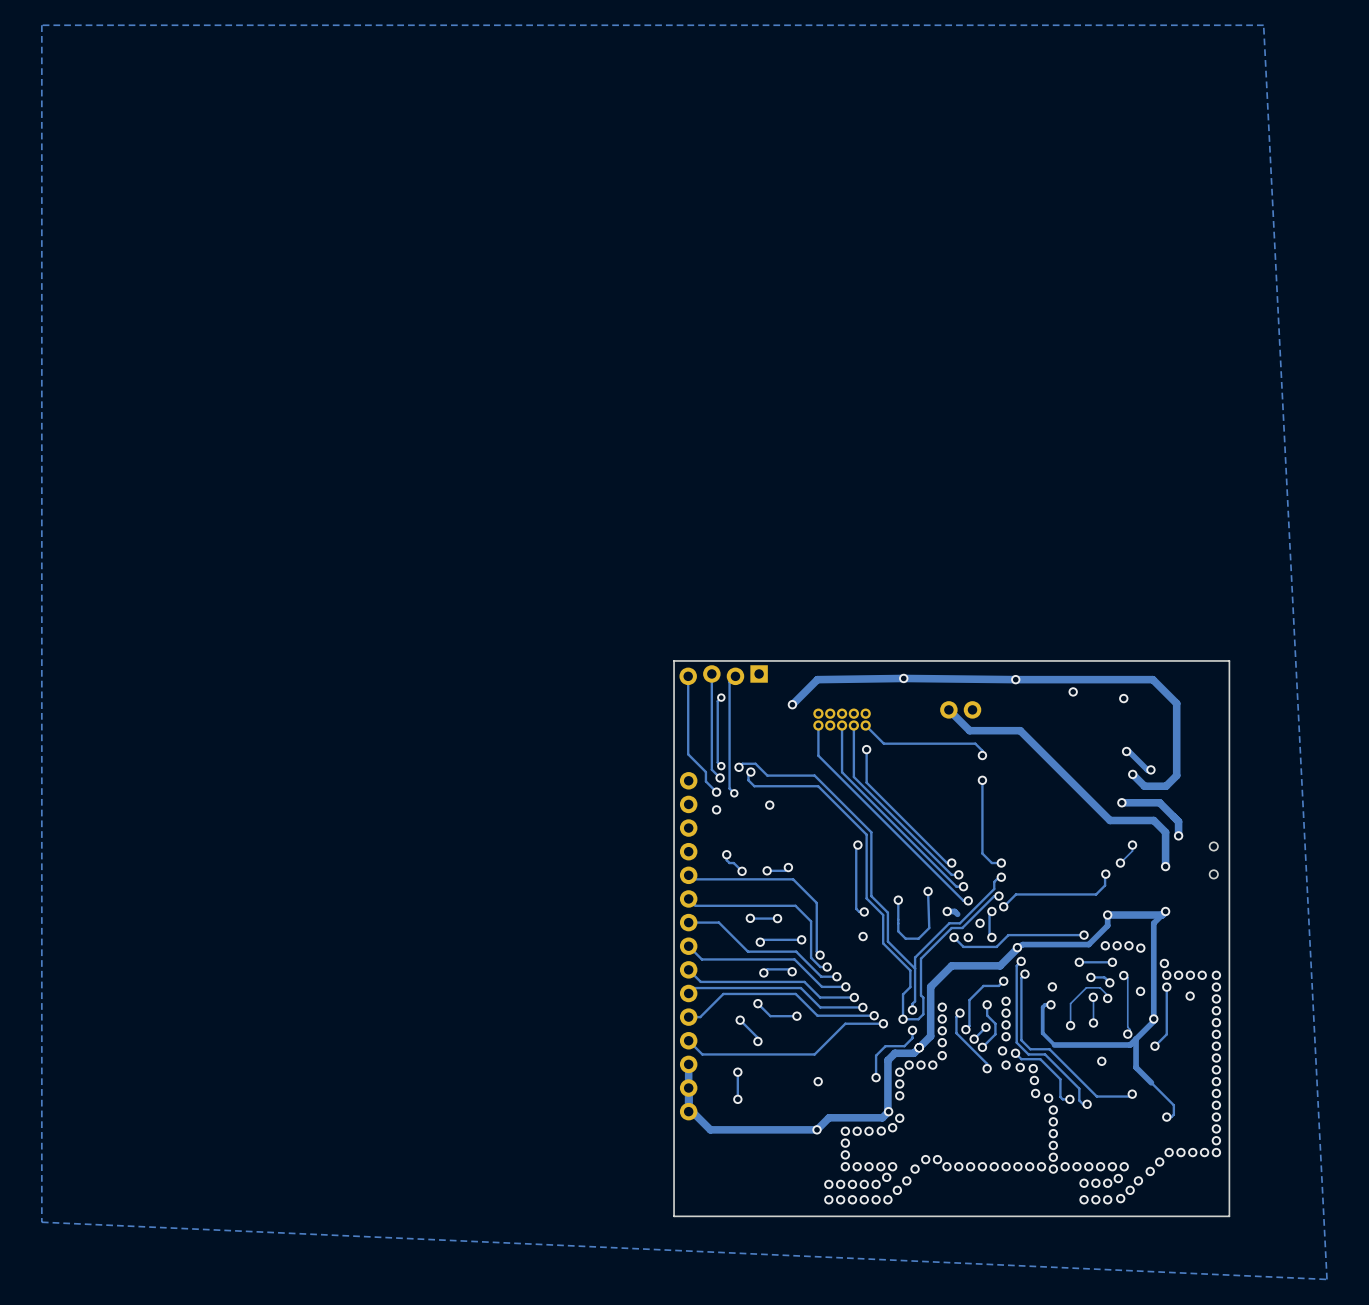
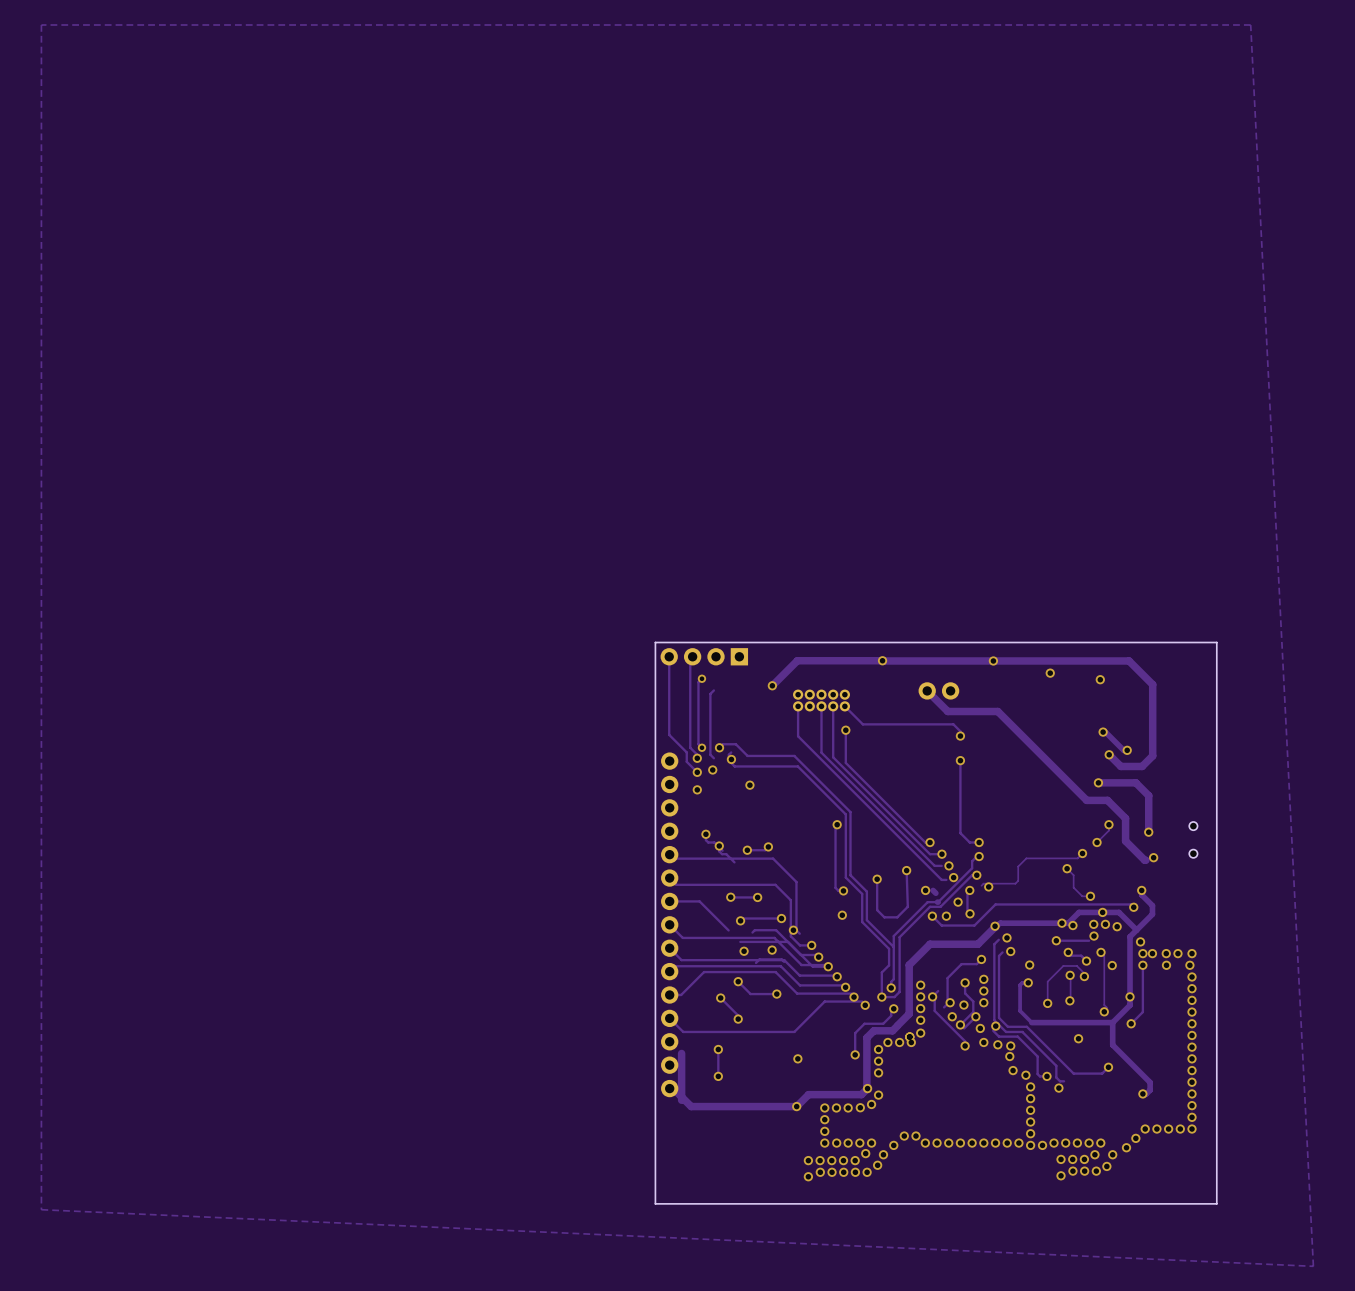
board edge: (1229, 660) (674, 660) (674, 1216) -> (1216, 654) (1216, 642) (655, 642) (655, 1203) (667, 1203)
track: none -> (669, 656) (669, 734) (686, 752) (686, 761) (697, 772)
track: none -> (692, 656) (690, 659) (690, 747) (697, 754) (697, 758)
part: none -> (704, 656)
track: (711, 673) (711, 769) (720, 777) -> none
part: (723, 675) -> none
track: (688, 676) (688, 754) (705, 772) (705, 781) (716, 792) -> none
track: (735, 676) (729, 682) (729, 788) (734, 793) -> none
via position: (903, 678) -> (882, 660)
via position: (1015, 679) -> (993, 660)
track: none -> (701, 678) (698, 682) (698, 744) (701, 747)
via position: (1073, 691) -> (1050, 673)
track: none -> (772, 685) (797, 660) (1129, 660) (1152, 684) (1152, 755) (1142, 766) (1120, 766) (1109, 754)
via position: (721, 697) -> (701, 678)
track: none -> (927, 690) (947, 711) (997, 711) (1086, 800) (1107, 800) (1125, 818) (1125, 841) (1145, 860)
via position: (1123, 698) -> (1100, 679)
track: (792, 704) (817, 679) (1152, 679) (1176, 703) (1176, 775) (1166, 786) (1144, 786) (1132, 774) -> none
via position: (792, 704) -> (772, 685)
track: (948, 709) (969, 730) (1020, 730) (1110, 820) (1153, 820) (1165, 832) (1165, 866) -> none
part position: (960, 709) -> (938, 690)
part position: (842, 719) -> (821, 700)
track: (818, 725) (818, 755) (963, 900) (968, 900) -> (798, 706) (798, 736) (941, 879) (946, 879)
track: (842, 725) (842, 772) (956, 886) (963, 886) -> (821, 706) (821, 752) (934, 865) (941, 865)
track: (853, 725) (853, 777) (951, 874) (958, 874) -> (833, 706) (833, 757) (930, 854) (937, 854)
track: (865, 725) (883, 743) (975, 743) (982, 750) (982, 755) -> (844, 706) (862, 724) (953, 724) (960, 731) (960, 736)
via: none -> (1103, 732)
via: none -> (960, 736)
track: (866, 749) (866, 782) (946, 863) (951, 863) -> (845, 730) (845, 762) (925, 842) (930, 842)
via position: (866, 749) -> (845, 730)
track: (1126, 751) (1128, 751) (1147, 769) (1150, 769) -> (1103, 732) (1105, 732) (1123, 750) (1127, 750)
via: (1126, 751) -> none
via: none -> (719, 747)
via: (982, 755) -> none
via: none -> (1127, 750)
track: none -> (731, 752) (728, 754) (728, 760) (734, 766) (797, 766) (845, 814) (845, 877) (862, 893) (862, 922) (889, 948) (889, 965) (881, 972) (881, 997) (894, 997) (899, 991) (899, 937) (930, 906) (940, 906) (972, 875) (976, 875)
via: none -> (1109, 754)
track: (755, 763) (767, 775) (814, 775) (871, 832) (871, 896) (887, 912) (887, 941) (915, 968) -> (747, 755) (794, 755) (850, 812) (850, 875) (866, 891) (866, 920) (893, 947)
track: (755, 763) (742, 763) (739, 767) -> (747, 755) (735, 744) (723, 744) (719, 747)
via: none -> (697, 758)
via position: (721, 766) -> (701, 747)
via: none -> (960, 760)
via: (1150, 769) -> none
track: (750, 772) (748, 774) (748, 780) (754, 786) (818, 786) (866, 834) (866, 898) (883, 915) (883, 943) (910, 970) (910, 987) (903, 994) (903, 1019) (918, 1019) (923, 1014) (923, 997) (920, 995) (920, 958) (951, 928) (962, 928) (994, 896) (998, 896) -> none
via: (750, 772) -> none
via: (1132, 774) -> none
via: none -> (697, 772)
track: (982, 780) (982, 853) (991, 863) (1001, 863) -> (960, 760) (960, 833) (969, 842) (979, 842)
via: (982, 780) -> none
track: none -> (1098, 782) (1135, 782) (1148, 795) (1148, 832)
via: none -> (1098, 782)
via: (716, 792) -> none
via: (734, 793) -> none
via: none -> (749, 785)
via: none -> (697, 789)
track: (1121, 802) (1159, 802) (1178, 821) (1178, 835) -> none
via: (1121, 802) -> none
via: (769, 805) -> none
via: (716, 809) -> none
via: none -> (1108, 824)
via: (1178, 835) -> none
via: none -> (1148, 832)
track: none -> (705, 834) (705, 840) (708, 842) (714, 842) (722, 850)
via: none -> (705, 834)
track: (857, 845) (856, 846) (856, 908) (859, 911) (864, 911) -> (837, 824) (835, 826) (835, 887) (838, 890) (843, 890)
via position: (857, 845) -> (837, 824)
track: (1132, 845) (1132, 850) (1120, 863) -> (1108, 824) (1108, 830) (1097, 842)
via: (1132, 845) -> none
via: none -> (930, 842)
via: none -> (979, 842)
via: none -> (1097, 842)
via: none -> (768, 846)
via: none -> (747, 850)
part position: (1213, 860) -> (1193, 839)
track: none -> (1082, 853) (1077, 858) (1026, 858) (1018, 866) (1018, 880) (1015, 883) (983, 883) (981, 885)
via: none -> (1082, 853)
via: (1001, 863) -> none
via: (1120, 863) -> none
via: none -> (979, 856)
track: (788, 867) (785, 870) (767, 870) -> (768, 846) (765, 850) (747, 850)
via: (788, 867) -> none
via: (767, 870) -> none
via: (742, 871) -> none
track: (1105, 874) (1105, 885) (1096, 894) (1015, 894) (1003, 906) -> none
via: (1105, 874) -> none
track: (688, 875) (692, 879) (793, 879) (816, 902) (816, 951) (820, 955) -> (669, 854) (673, 858) (773, 858) (796, 882) (796, 930) (799, 933)
track: (1001, 877) (994, 881) (994, 889) (959, 923) (949, 923) (915, 957) (915, 1001) (912, 1003) (912, 1010) -> none
via: (1001, 877) -> none
track: none -> (1067, 868) (1073, 875) (1073, 887) (1082, 896) (1090, 896)
via: none -> (1067, 868)
via: none -> (906, 870)
via: none -> (976, 875)
via: none -> (877, 879)
track: (928, 891) (929, 928) (918, 938) (905, 938) (898, 931) (898, 900) -> (906, 870) (907, 906) (897, 917) (884, 917) (877, 910) (877, 879)
via: (928, 891) -> none
track: (688, 898) (695, 905) (795, 905) (811, 921) (811, 957) (820, 967) (827, 967) -> (669, 878) (676, 884) (775, 884) (790, 900) (790, 936) (799, 945) (806, 945)
via: none -> (925, 890)
track: none -> (933, 890) (935, 893)
via: none -> (969, 890)
track: none -> (1141, 890) (1141, 894) (1152, 905) (1152, 914) (1130, 936) (1130, 1005) (1112, 1022)
via: none -> (1141, 890)
via: none -> (843, 890)
via: (898, 900) -> none
via: (968, 900) -> none
via: none -> (1090, 896)
via: none -> (730, 897)
via: none -> (757, 897)
via: (1003, 906) -> none
via: (864, 911) -> none
track: (947, 911) (954, 911) (957, 914) -> (938, 902) (972, 868) (972, 861) (979, 856)
track: none -> (937, 902) (927, 902) (893, 936) (893, 979) (891, 981) (891, 987)
via: (947, 911) -> none
via: none -> (958, 902)
track: (991, 911) (989, 913) (989, 935) (991, 937) -> (969, 890) (967, 892) (967, 913) (969, 916)
via: (991, 911) -> none
via: (1165, 911) -> none
via: (1107, 915) -> none
track: none -> (1133, 907) (1130, 904) (995, 904) (974, 925) (941, 925) (932, 916)
via: none -> (1133, 907)
track: (750, 918) (777, 918) -> (730, 897) (757, 897)
via: (750, 918) -> none
via: (777, 918) -> none
via: none -> (1102, 912)
track: (688, 922) (718, 922) (748, 951) -> (669, 901) (699, 901) (728, 930)
via: none -> (842, 915)
via: none -> (932, 916)
via: none -> (946, 916)
track: none -> (781, 918) (742, 918) (740, 920)
via: none -> (781, 918)
via: none -> (740, 920)
via: none -> (1061, 923)
via: none -> (1093, 924)
via: none -> (1105, 924)
track: (1084, 935) (1008, 935) (996, 946) (963, 946) (954, 937) -> none
via: (863, 936) -> none
via: none -> (1117, 926)
via: (954, 937) -> none
via: (968, 937) -> none
via position: (991, 937) -> (995, 926)
track: (801, 939) (784, 939) -> (816, 955) (800, 955) (776, 930)
track: none -> (1136, 930) (1119, 912) (1079, 912) (1068, 923) (1000, 923) (977, 944) (930, 944) (909, 965) (909, 1013) (892, 1030) (873, 1030) (866, 1037) (867, 1088) (861, 1094) (808, 1094) (796, 1106) (691, 1106) (669, 1085)
via: (760, 942) -> none
via: (1117, 945) -> none
via: (1128, 945) -> none
track: (688, 946) (701, 959) (794, 959) (821, 986) (845, 986) -> (669, 924) (682, 937) (774, 937) (801, 965) (825, 965)
part position: (688, 946) -> (669, 924)
via: (1140, 948) -> none
via: none -> (1056, 940)
via: none -> (1140, 941)
via: none -> (772, 950)
via: none -> (744, 951)
track: (1021, 961) (1016, 965) (1016, 1042) (1028, 1054) (1045, 1054) (1079, 1088) (1079, 1100) (1083, 1104) (1087, 1104) -> (998, 939) (994, 944) (994, 1020) (1006, 1031) (1022, 1031) (1056, 1065) (1056, 1077) (1060, 1081) (1064, 1081)
track: none -> (1002, 952) (999, 955) (999, 1017) (1007, 1026) (1026, 1026) (1073, 1073) (1102, 1073) (1108, 1067)
track: (1112, 962) (1079, 962) -> (1089, 940) (1056, 940)
via: none -> (1142, 953)
via: none -> (1166, 953)
via: none -> (1177, 953)
via: none -> (1192, 953)
track: (688, 969) (700, 981) (804, 981) (820, 997) (854, 997) -> (669, 948) (681, 960) (784, 960) (799, 975) (833, 975)
via: none -> (981, 959)
via: (792, 971) -> none
via: none -> (1086, 961)
via: (763, 972) -> none
track: (1024, 974) (1021, 977) (1021, 1040) (1030, 1049) (1049, 1049) (1096, 1096) (1129, 1096) (1132, 1094) -> none
via: (1024, 974) -> none
via: none -> (1029, 965)
track: (1123, 975) (1127, 977) (1127, 1027) (1130, 1029) (1127, 1034) -> (1100, 953) (1104, 955) (1104, 1005) (1106, 1007) (1104, 1011)
via: none -> (1142, 965)
via: (1166, 975) -> none
via: (1190, 975) -> none
via: (1216, 975) -> none
track: (1090, 977) (1104, 977) (1109, 982) (1105, 977) -> (1067, 955) (1081, 955) (1086, 961) (1082, 956)
via: (1090, 977) -> none
track: (1003, 981) (998, 985) (983, 985) (969, 1000) (969, 1026) (965, 1029) -> (981, 959) (976, 964) (961, 964) (947, 978) (947, 1003) (944, 1007)
via: (1003, 981) -> none
via: (1109, 982) -> none
track: none -> (1070, 975) (1069, 1000)
via: none -> (1070, 975)
via: (1052, 986) -> none
via: none -> (1084, 976)
track: (1166, 987) (1166, 1034) (1154, 1046) -> (1142, 965) (1142, 1012) (1131, 1023)
via: (1166, 987) -> none
via: none -> (1192, 976)
via: (1216, 987) -> none
via: none -> (983, 979)
via: none -> (738, 981)
via: (1140, 991) -> none
track: (688, 993) (694, 988) (800, 988) (820, 1007) (862, 1007) -> (669, 971) (675, 966) (780, 966) (799, 985) (842, 985)
via: none -> (965, 982)
track: none -> (1028, 982) (1022, 982) (1020, 985) (1020, 1010) (1031, 1022) (1112, 1022)
via: none -> (1028, 982)
via: none -> (920, 985)
via: (1190, 996) -> none
track: (1093, 997) (1093, 1023) -> none
via: (1093, 997) -> none
via: none -> (891, 987)
track: (1107, 998) (1107, 995) (1100, 987) (1086, 987) (1070, 1003) (1070, 1025) -> (1084, 976) (1084, 973) (1076, 965) (1063, 965) (1047, 981) (1047, 1003)
via: (1107, 998) -> none
via: none -> (1192, 988)
via: (1216, 998) -> none
via: none -> (983, 991)
via: (1006, 1001) -> none
track: (757, 1003) (770, 1016) (796, 1016) -> (738, 981) (750, 994) (776, 994)
via: (757, 1003) -> none
via: none -> (776, 994)
track: (987, 1004) (987, 1015) (995, 1023) (995, 1034) (982, 1047) -> (965, 982) (965, 993) (973, 1001) (973, 1012) (960, 1024)
via: (987, 1004) -> none
track: (1050, 1004) (1045, 1004) (1042, 1007) (1042, 1033) (1054, 1045) (1130, 1045) (1153, 1021) (1153, 923) (1165, 911) (1162, 915) (1107, 915) (1107, 925) (1088, 944) (1022, 944) (1000, 965) (951, 965) (930, 986) (930, 1036) (913, 1053) (894, 1053) (887, 1060) (888, 1111) (882, 1117) (829, 1117) (817, 1129) (710, 1129) (688, 1108) -> none
via: (1050, 1004) -> none
via: none -> (881, 997)
via: none -> (920, 996)
via: none -> (1130, 996)
via: none -> (720, 998)
via: (912, 1010) -> none
via: none -> (1192, 1000)
via: (1216, 1010) -> none
via: none -> (1069, 1000)
track: (959, 1013) (956, 1016) (956, 1033) (987, 1063) (987, 1068) -> (938, 991) (934, 994) (934, 1010) (965, 1041) (965, 1045)
via: none -> (983, 1002)
via: (1006, 1013) -> none
via: none -> (1047, 1003)
track: (874, 1015) (817, 1015) (795, 993) (723, 993) (700, 1017) (688, 1017) -> (853, 993) (797, 993) (775, 972) (704, 972) (681, 995) (669, 995)
via: none -> (963, 1005)
via: (796, 1016) -> none
via: none -> (920, 1008)
via: (942, 1019) -> none
via: (1153, 1019) -> none
track: (740, 1020) (757, 1037) (757, 1041) -> (720, 998) (738, 1015) (738, 1019)
via: (740, 1020) -> none
via: none -> (1104, 1011)
via: none -> (1192, 1012)
via: (1216, 1022) -> none
track: (883, 1023) (845, 1023) (814, 1054) (702, 1054) (688, 1040) -> (862, 1001) (824, 1001) (794, 1031) (683, 1031) (669, 1018)
via: (883, 1023) -> none
via: (1093, 1023) -> none
via: (1006, 1024) -> none
via: (1070, 1025) -> none
via: none -> (952, 1016)
via: none -> (738, 1019)
via: (965, 1029) -> none
track: (912, 1030) (912, 1038) (904, 1046) (885, 1046) (876, 1055) (876, 1077) -> (891, 1008) (891, 1015) (883, 1023) (864, 1023) (855, 1033) (855, 1054)
via: (912, 1030) -> none
via: none -> (920, 1020)
via: (942, 1030) -> none
track: none -> (1112, 1022) (1112, 1045) (1150, 1082) (1150, 1090) (1146, 1093) (1142, 1093)
via: (1127, 1034) -> none
via: none -> (1131, 1023)
via: none -> (1192, 1023)
via: (1216, 1034) -> none
via: none -> (960, 1024)
via: (974, 1039) -> none
via: none -> (980, 1028)
track: (1136, 1039) (1136, 1067) (1173, 1105) (1173, 1114) (1166, 1117) -> none
via: (757, 1041) -> none
via: (942, 1042) -> none
via: none -> (920, 1033)
via: (1154, 1046) -> none
via: none -> (1192, 1035)
via: (1216, 1046) -> none
via: (982, 1047) -> none
via: none -> (1078, 1038)
via: (1002, 1050) -> none
via: none -> (887, 1042)
via: none -> (899, 1042)
via: none -> (911, 1042)
via: none -> (983, 1042)
track: (1015, 1053) (1021, 1059) (1040, 1059) (1060, 1079) (1060, 1097) (1062, 1099) (1069, 1099) -> (993, 1030) (999, 1036) (1017, 1036) (1037, 1056) (1037, 1074) (1039, 1076) (1046, 1076)
via: (1015, 1053) -> none
via: (942, 1055) -> none
via: none -> (997, 1044)
via: none -> (965, 1045)
via: none -> (1010, 1045)
via: none -> (1192, 1047)
via: (1216, 1058) -> none
via: none -> (718, 1049)
via: none -> (878, 1049)
via: (1101, 1061) -> none
via: none -> (855, 1054)
via: (909, 1065) -> none
via: (920, 1065) -> none
via: (932, 1065) -> none
via: (1006, 1065) -> none
via: (987, 1068) -> none
via: (1033, 1068) -> none
via: none -> (1192, 1058)
via: (1216, 1069) -> none
track: (737, 1072) (737, 1099) -> (718, 1049) (718, 1076)
via: (737, 1072) -> none
via: none -> (878, 1061)
via: (899, 1072) -> none
via: (876, 1077) -> none
via: none -> (1108, 1067)
via: (1034, 1080) -> none
via position: (818, 1081) -> (797, 1058)
via: none -> (1013, 1070)
via: none -> (1192, 1070)
via: (1216, 1081) -> none
via: none -> (878, 1072)
via: (899, 1084) -> none
via: none -> (1025, 1075)
via: none -> (718, 1076)
via: none -> (1046, 1076)
via: (1035, 1093) -> none
via: none -> (1192, 1082)
via: (1216, 1093) -> none
via: (1132, 1094) -> none
via: (899, 1095) -> none
via: none -> (1030, 1086)
via: (1048, 1098) -> none
via: (737, 1099) -> none
via: none -> (867, 1088)
via: (1087, 1104) -> none
via: none -> (1142, 1093)
via: none -> (1192, 1093)
via: (1216, 1105) -> none
via: none -> (878, 1095)
via: none -> (1030, 1098)
via: (1053, 1109) -> none
via: (888, 1111) -> none
via: none -> (871, 1104)
via: (1166, 1117) -> none
via: none -> (1192, 1105)
via: (1216, 1117) -> none
via: none -> (796, 1106)
via: (899, 1118) -> none
via: none -> (824, 1107)
via: none -> (836, 1107)
via: none -> (848, 1107)
via: none -> (860, 1107)
via: none -> (1030, 1110)
via: (1053, 1121) -> none
via: (892, 1127) -> none
via: none -> (1192, 1117)
via: (1216, 1128) -> none
via: (817, 1129) -> none
via: none -> (824, 1119)
via: (845, 1131) -> none
via: (857, 1131) -> none
via: (869, 1131) -> none
via: (881, 1131) -> none
via: none -> (1030, 1122)
via: (1053, 1133) -> none
via: none -> (1145, 1129)
via: none -> (1156, 1129)
via: none -> (1168, 1129)
via: none -> (1180, 1129)
via: none -> (1192, 1129)
via: (1216, 1140) -> none
via: none -> (824, 1131)
via: (845, 1143) -> none
via: none -> (1030, 1133)
via: (1053, 1145) -> none
via: none -> (904, 1136)
via: none -> (915, 1136)
via: none -> (1135, 1138)
via: (1169, 1152) -> none
via: (1180, 1152) -> none
via: (1192, 1152) -> none
via: (1204, 1152) -> none
via: (1216, 1152) -> none
via: none -> (824, 1143)
via: none -> (848, 1143)
via: none -> (859, 1143)
via: none -> (871, 1143)
via: none -> (925, 1143)
via: none -> (937, 1143)
via: none -> (948, 1143)
via: none -> (960, 1143)
via: none -> (972, 1143)
via: none -> (983, 1143)
via: none -> (995, 1143)
via: none -> (1007, 1143)
via: none -> (1018, 1143)
via: none -> (1054, 1143)
via: none -> (1065, 1143)
via: none -> (1077, 1143)
via: none -> (1089, 1143)
via: none -> (1100, 1143)
via: none -> (893, 1145)
via: none -> (1030, 1145)
via: (925, 1159) -> none
via: (937, 1159) -> none
via: none -> (1126, 1147)
via: (1159, 1161) -> none
via: none -> (865, 1153)
via: (845, 1166) -> none
via: (857, 1166) -> none
via: (869, 1166) -> none
via: (880, 1166) -> none
via: (946, 1166) -> none
via: (958, 1166) -> none
via: (970, 1166) -> none
via: (982, 1166) -> none
via: (994, 1166) -> none
via: (1006, 1166) -> none
via: (1017, 1166) -> none
via: (1029, 1166) -> none
via: (1041, 1166) -> none
via: (1065, 1166) -> none
via: (1076, 1166) -> none
via: (1088, 1166) -> none
via: (1100, 1166) -> none
via: none -> (1094, 1154)
via: (1112, 1166) -> none
via: (915, 1169) -> none
via: (1053, 1169) -> none
via: none -> (1061, 1159)
via: none -> (1072, 1159)
via: none -> (1084, 1159)
via: (1150, 1171) -> none
via: none -> (808, 1160)
via: none -> (820, 1160)
via: none -> (831, 1160)
via: none -> (843, 1160)
via: none -> (855, 1160)
via: (906, 1180) -> none
via: (1138, 1180) -> none
via: none -> (1061, 1175)
via: none -> (808, 1176)
via: (897, 1190) -> none
via: (1130, 1190) -> none
via: (1120, 1198) -> none
via: (828, 1199) -> none
via: (840, 1199) -> none
via: (852, 1199) -> none
via: (864, 1199) -> none
via: (876, 1199) -> none
via: (887, 1199) -> none
via: (1084, 1199) -> none
via: (1095, 1199) -> none
via: (1107, 1199) -> none

